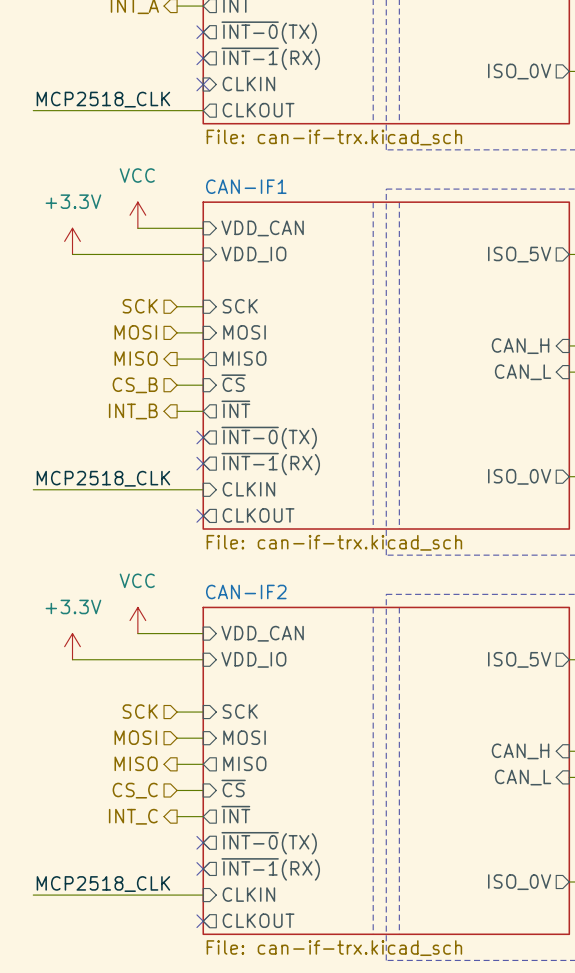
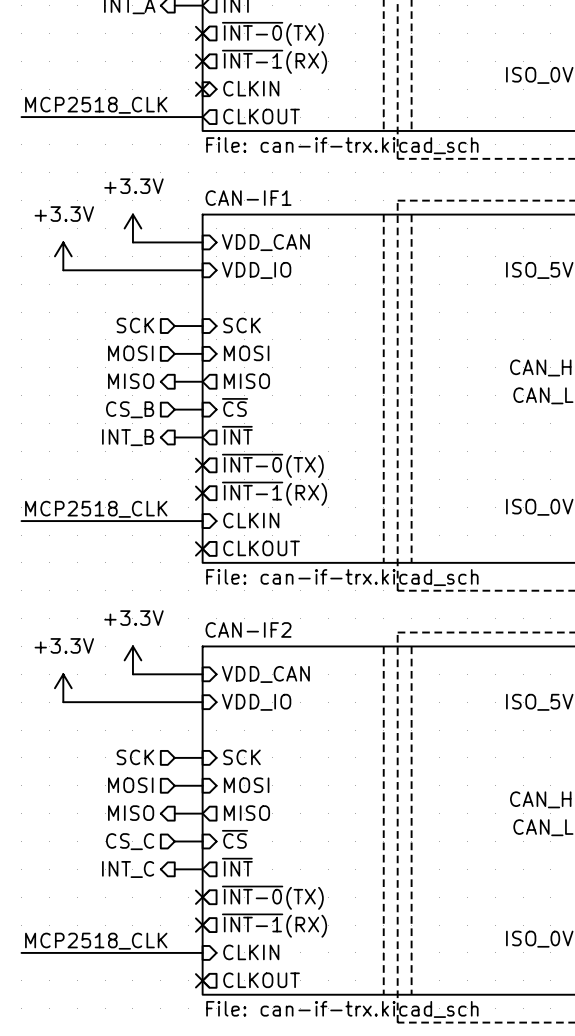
power symbol: VCC (137, 215) -> +3.3V (132, 228)
power symbol: VCC (137, 620) -> +3.3V (132, 660)

